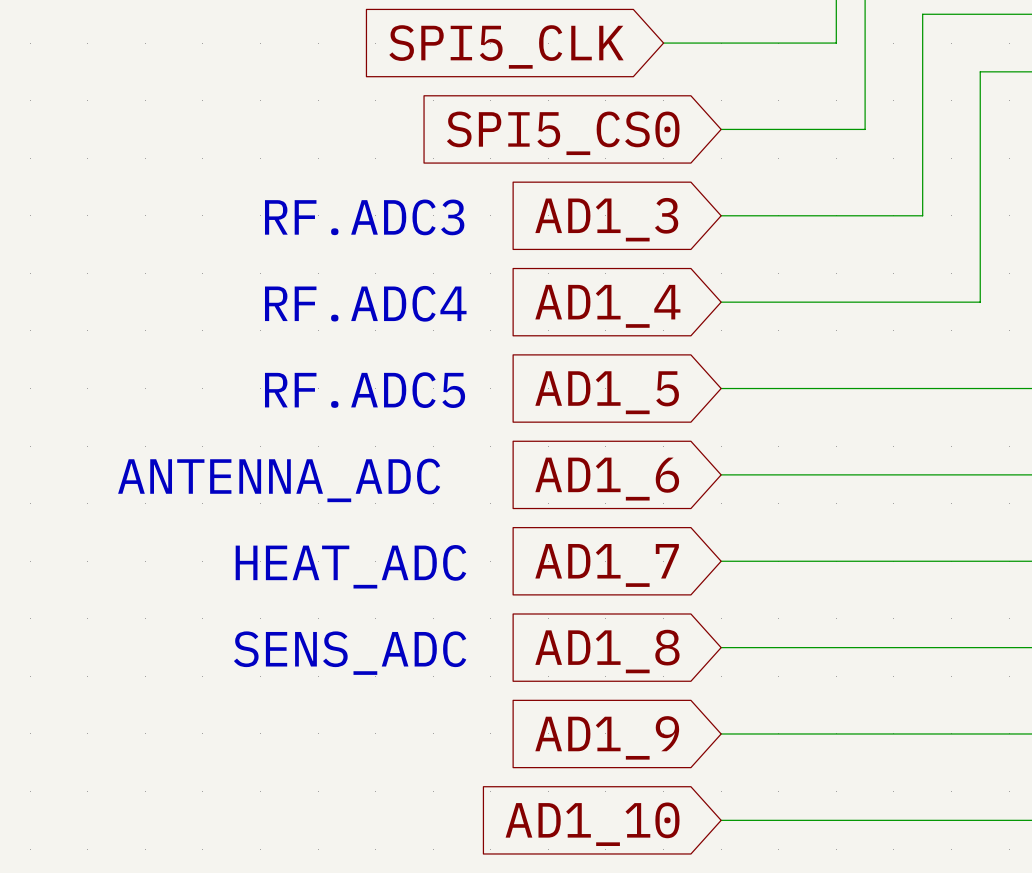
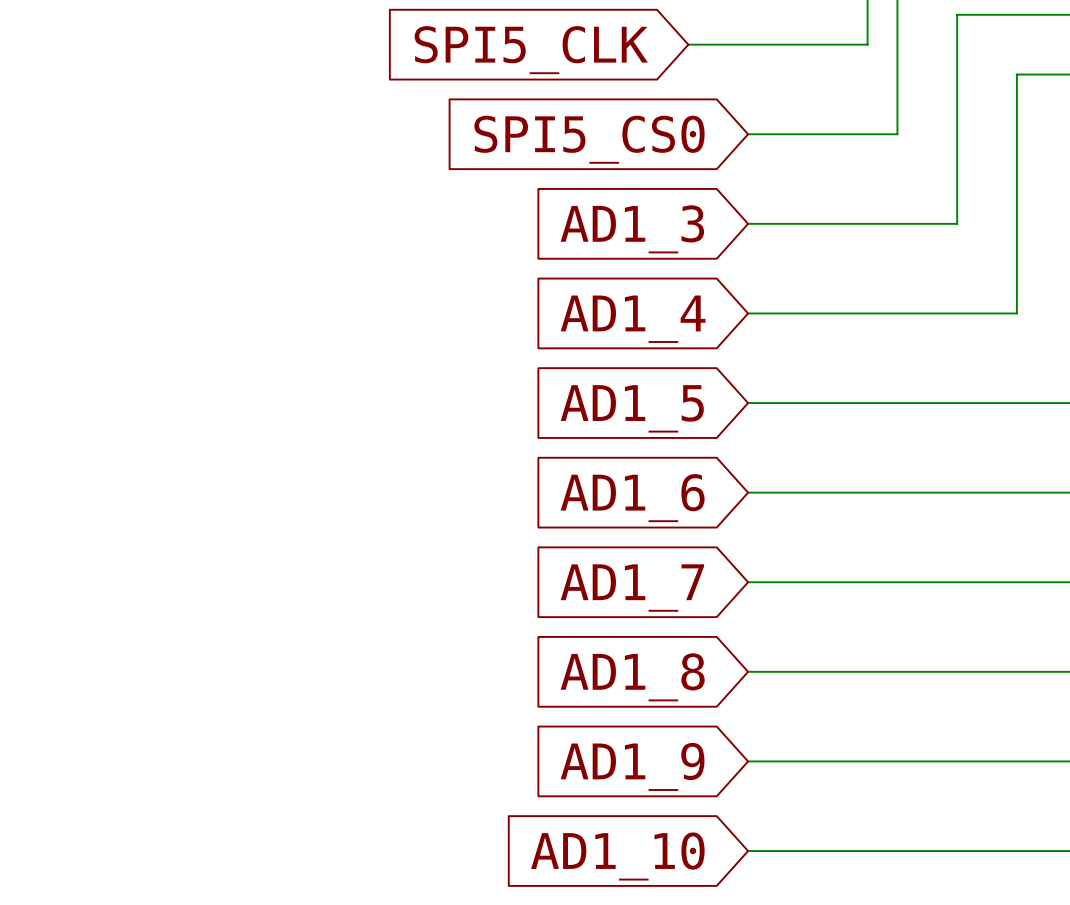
text: RF.ADC3 (364, 217) -> none
text: RF.ADC4 (365, 303) -> none
text: RF.ADC5 (365, 390) -> none
text: ANTENNA_ADC (279, 480) -> none
text: HEAT_ADC (350, 566) -> none
text: SENS_ADC (350, 653) -> none

